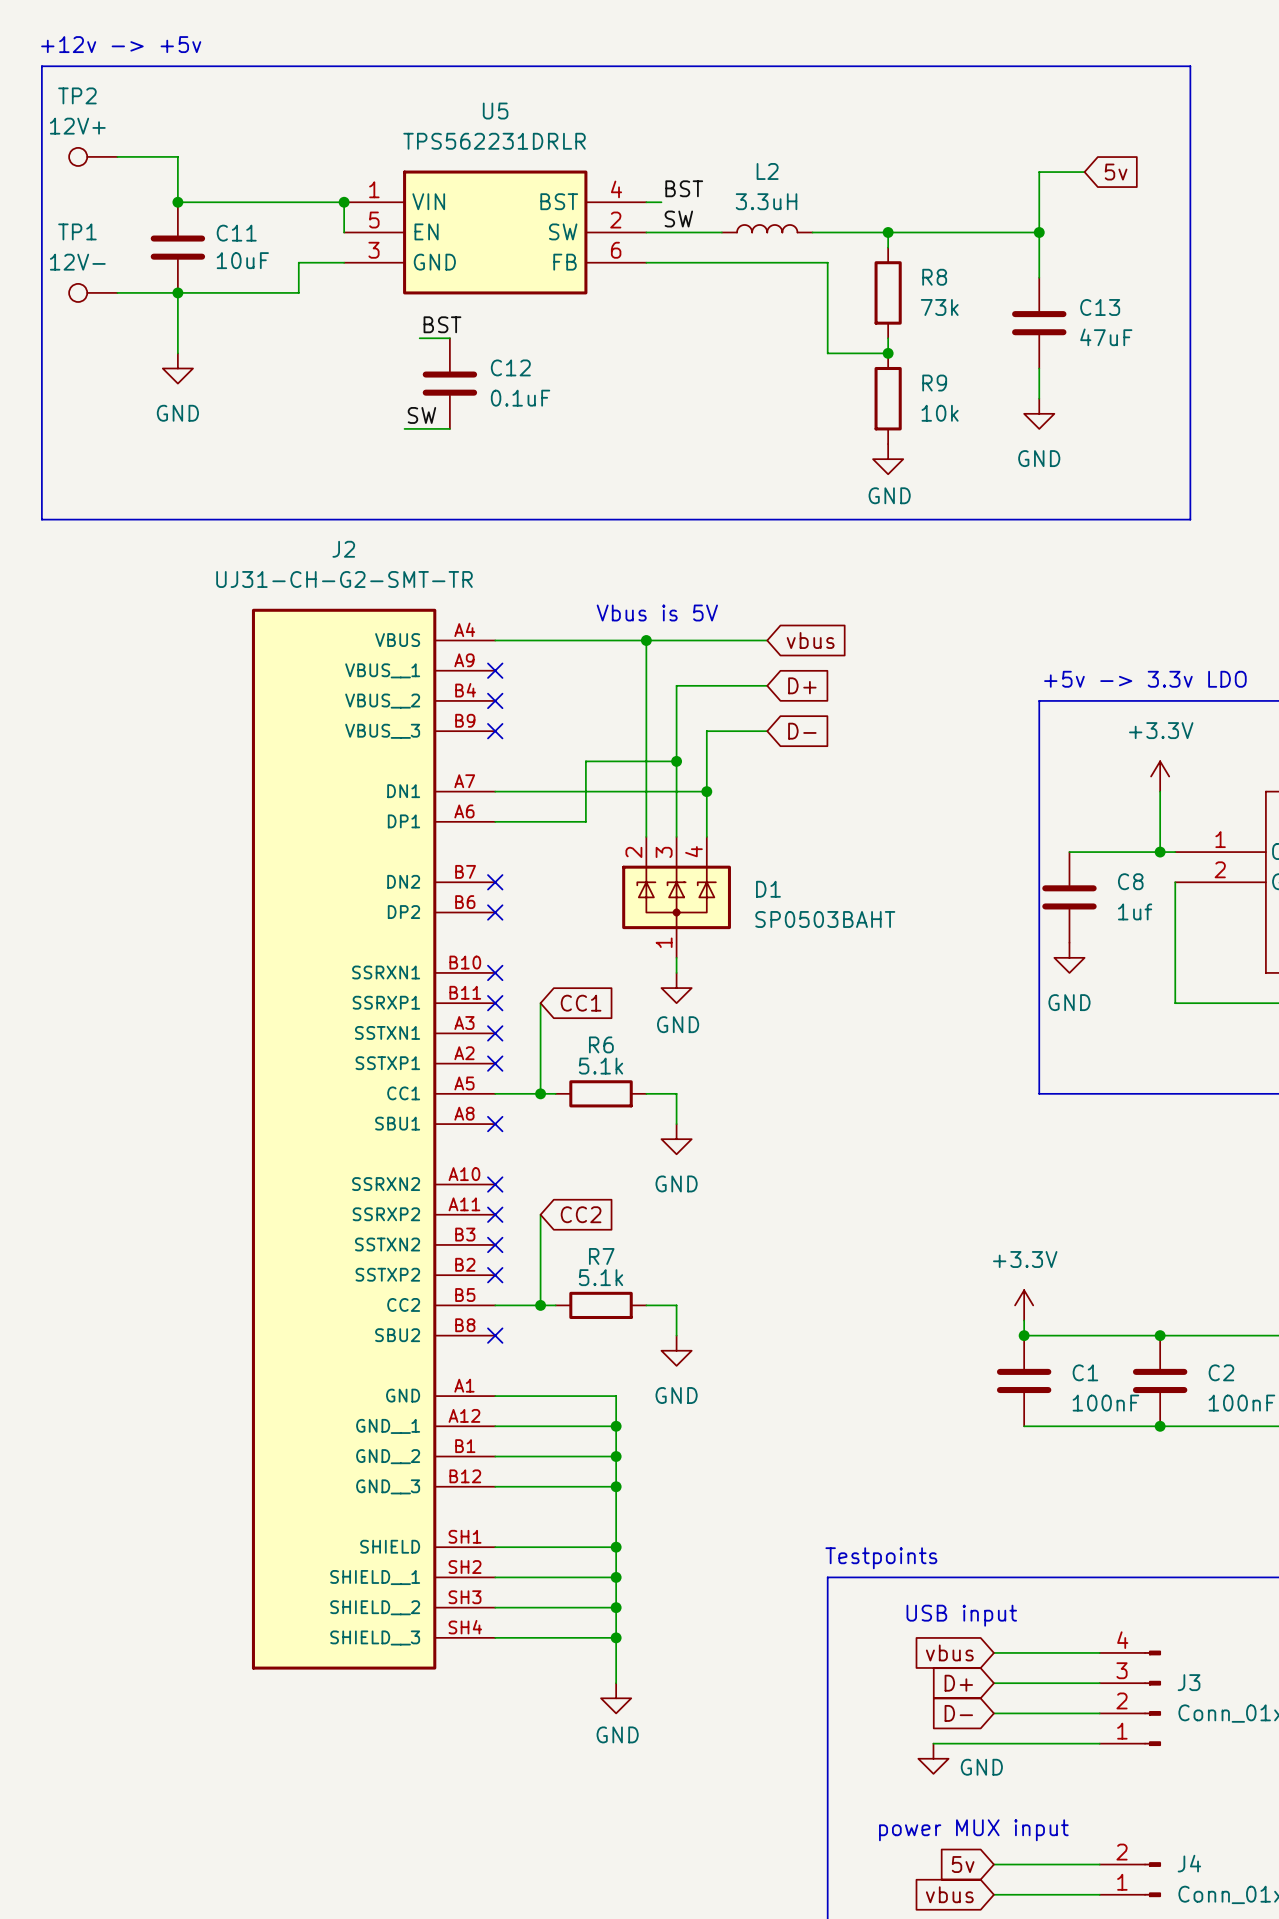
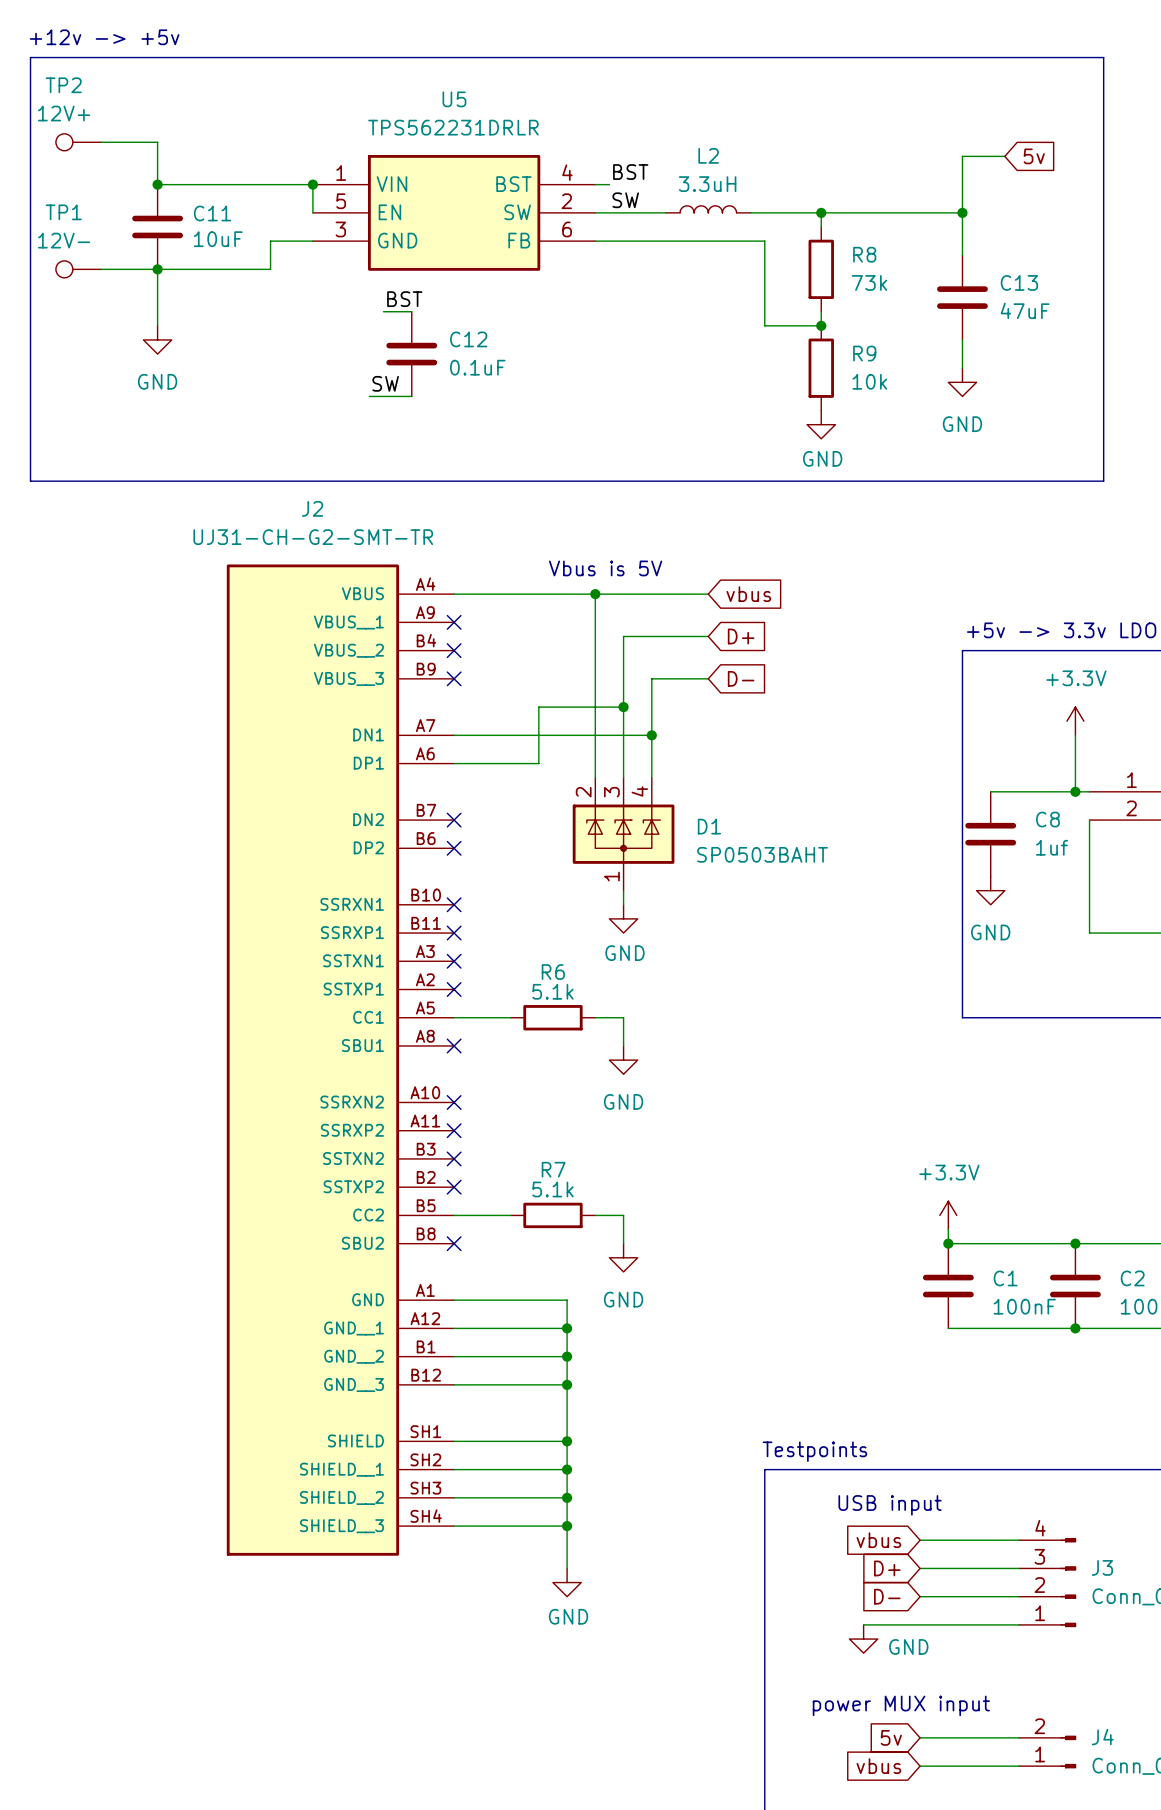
wire: (540, 1003) (540, 1093) -> none
global label: CC1 (581, 1003) -> none
junction: (540, 1093) -> none
wire: (540, 1214) (540, 1305) -> none
global label: CC2 (581, 1214) -> none
junction: (540, 1305) -> none

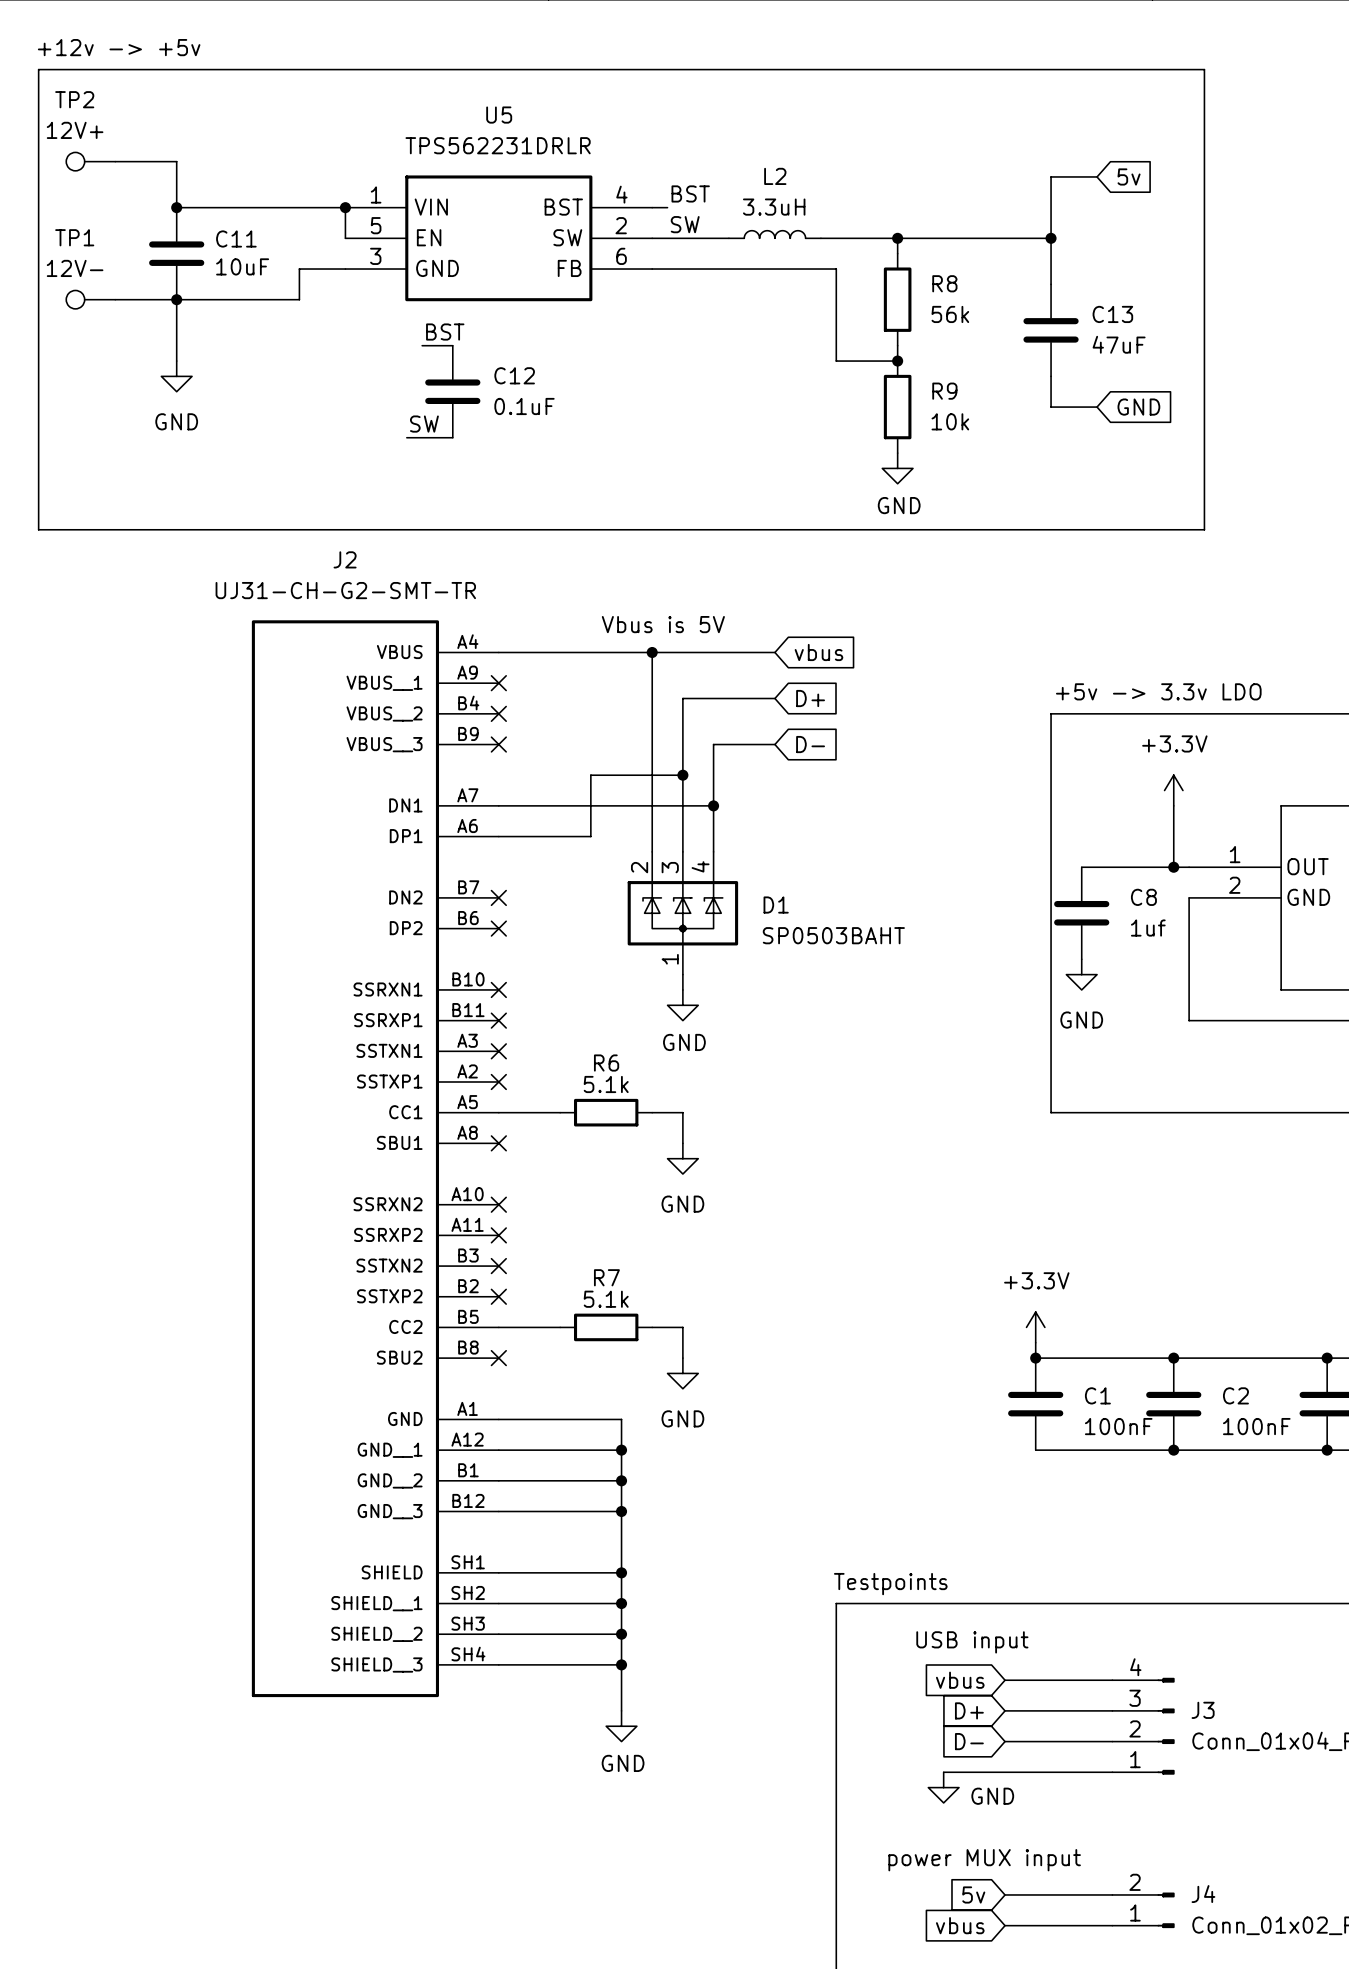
R8 value: 73k (869, 282) -> 56k (950, 314)
wire: none -> (1051, 407) (1097, 407)
global label: none -> GND (1138, 407)
power symbol: GND (962, 382) -> none

